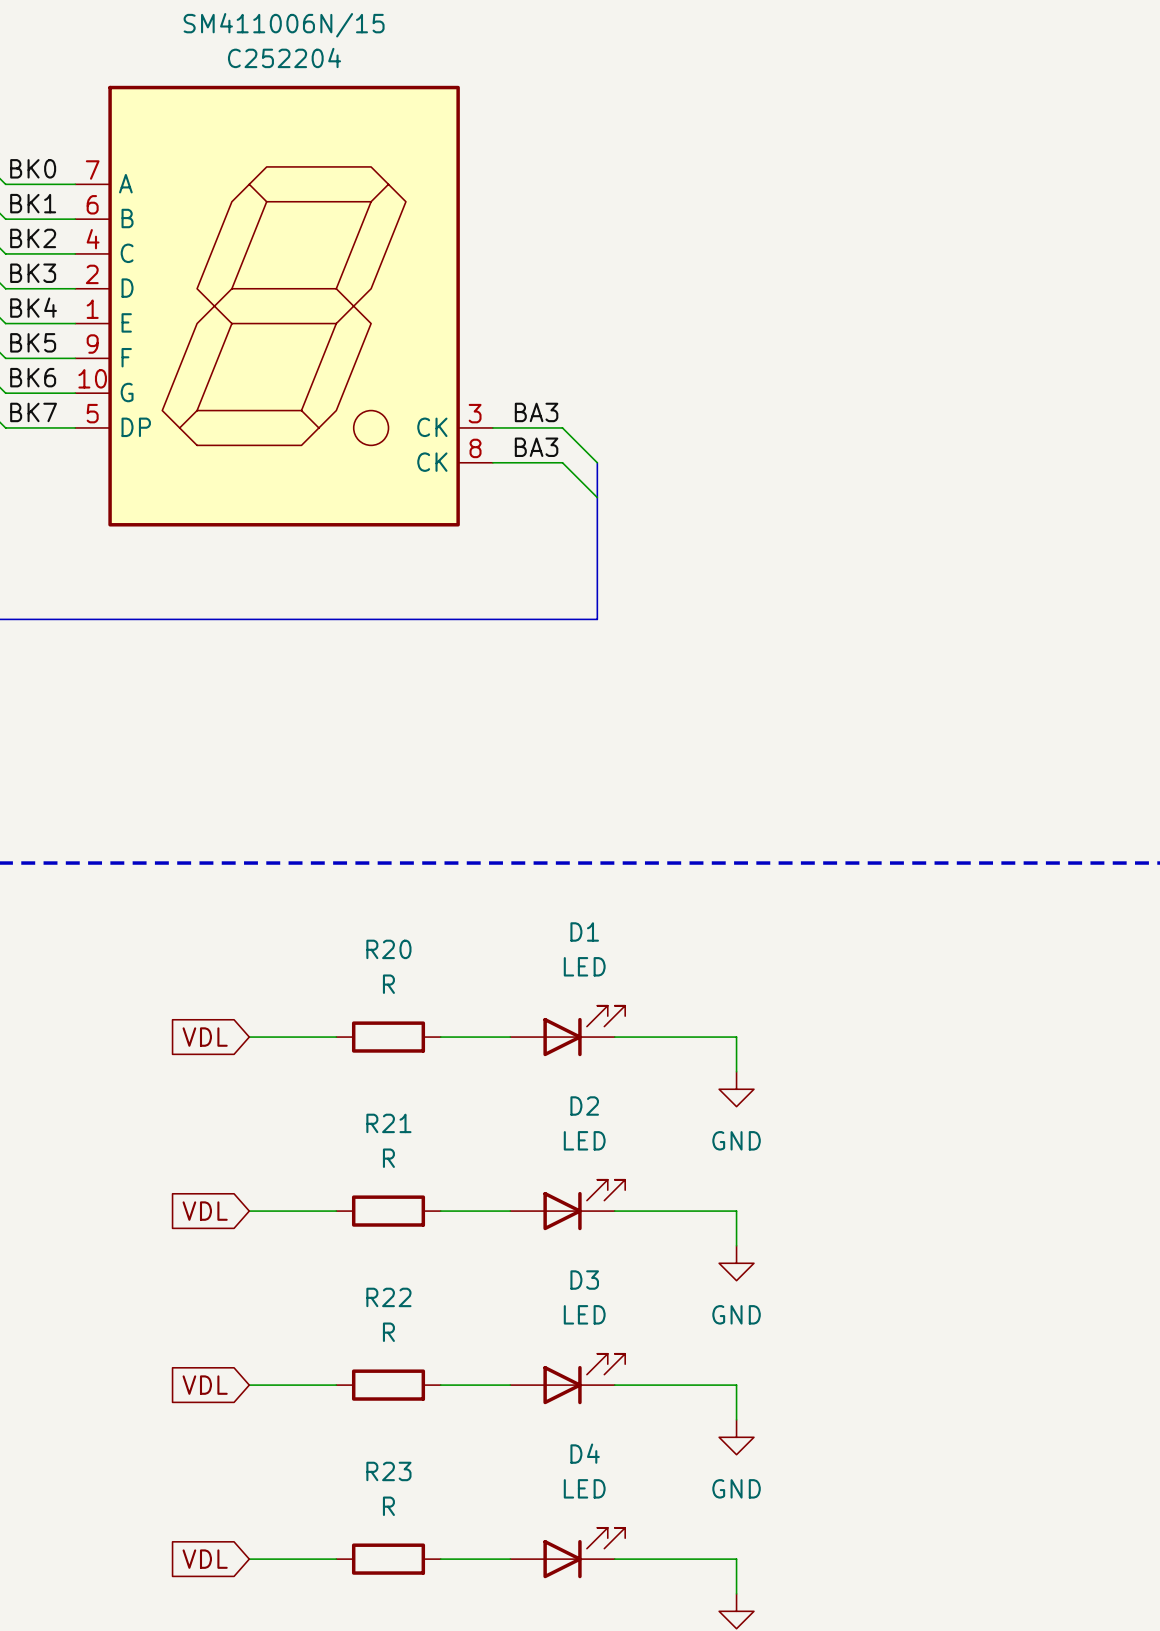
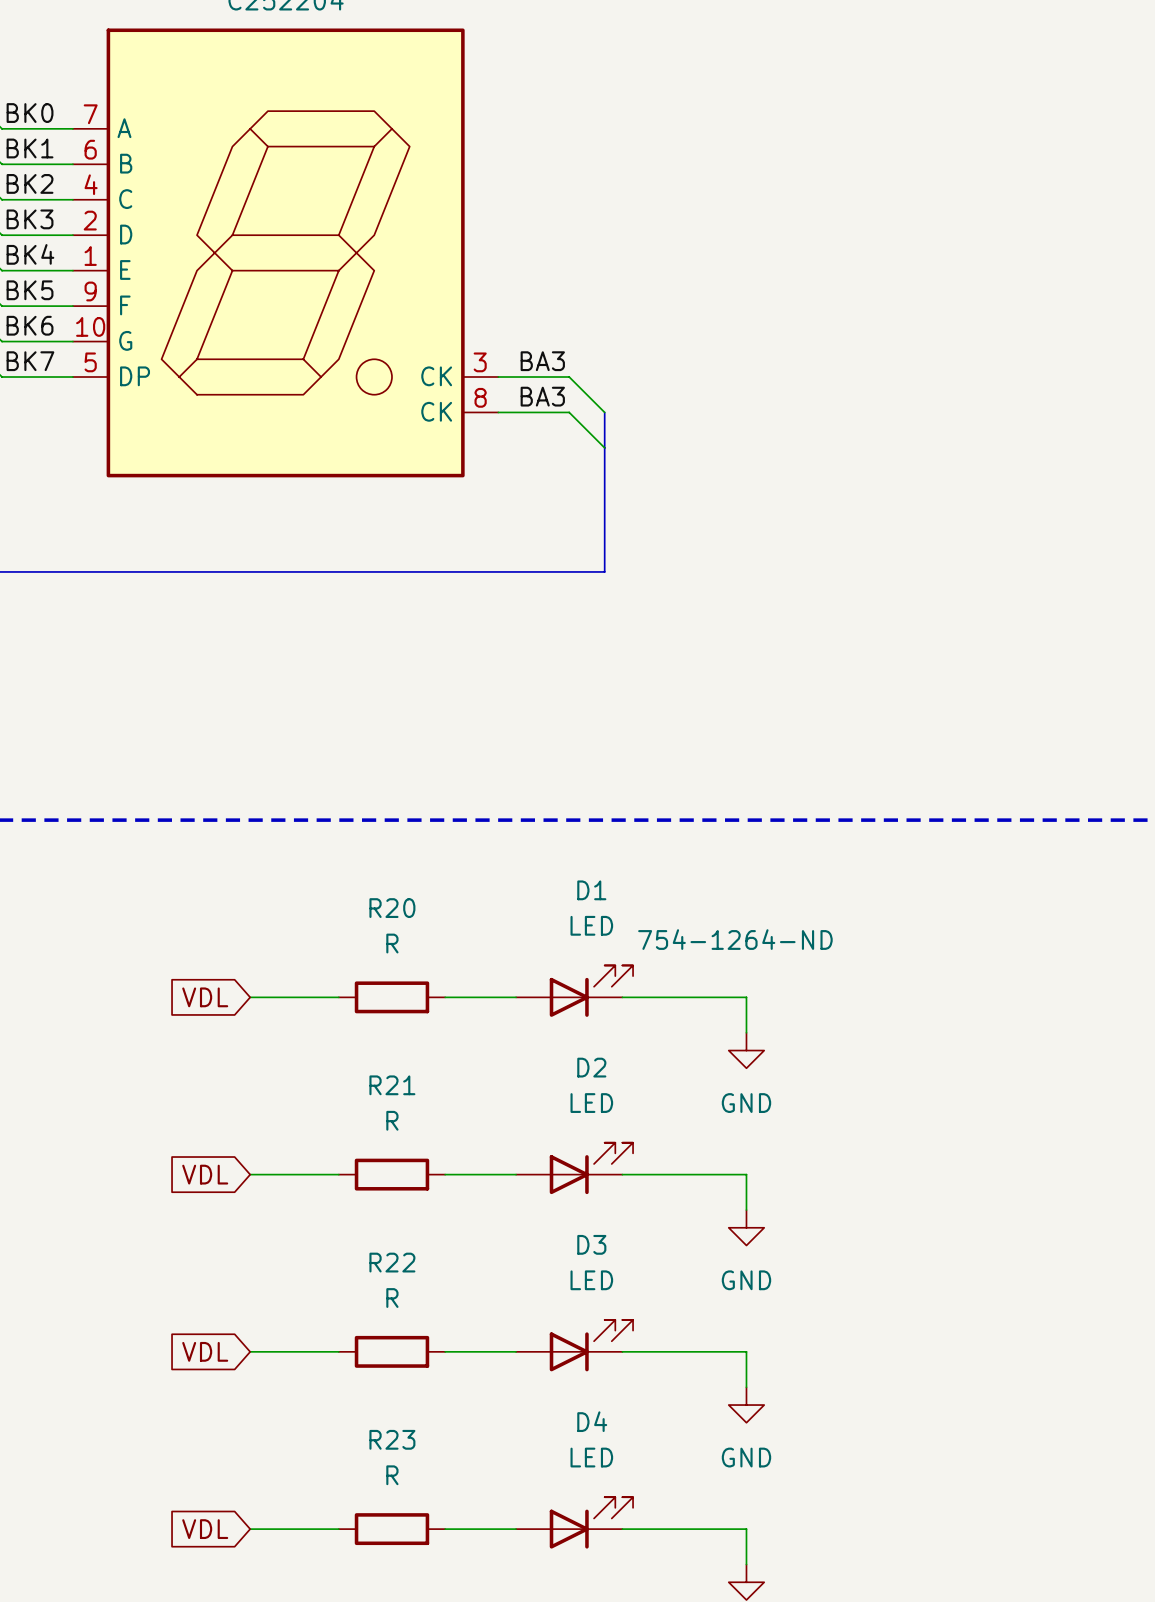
D1 text: none -> 754-1264-ND (735, 939)

